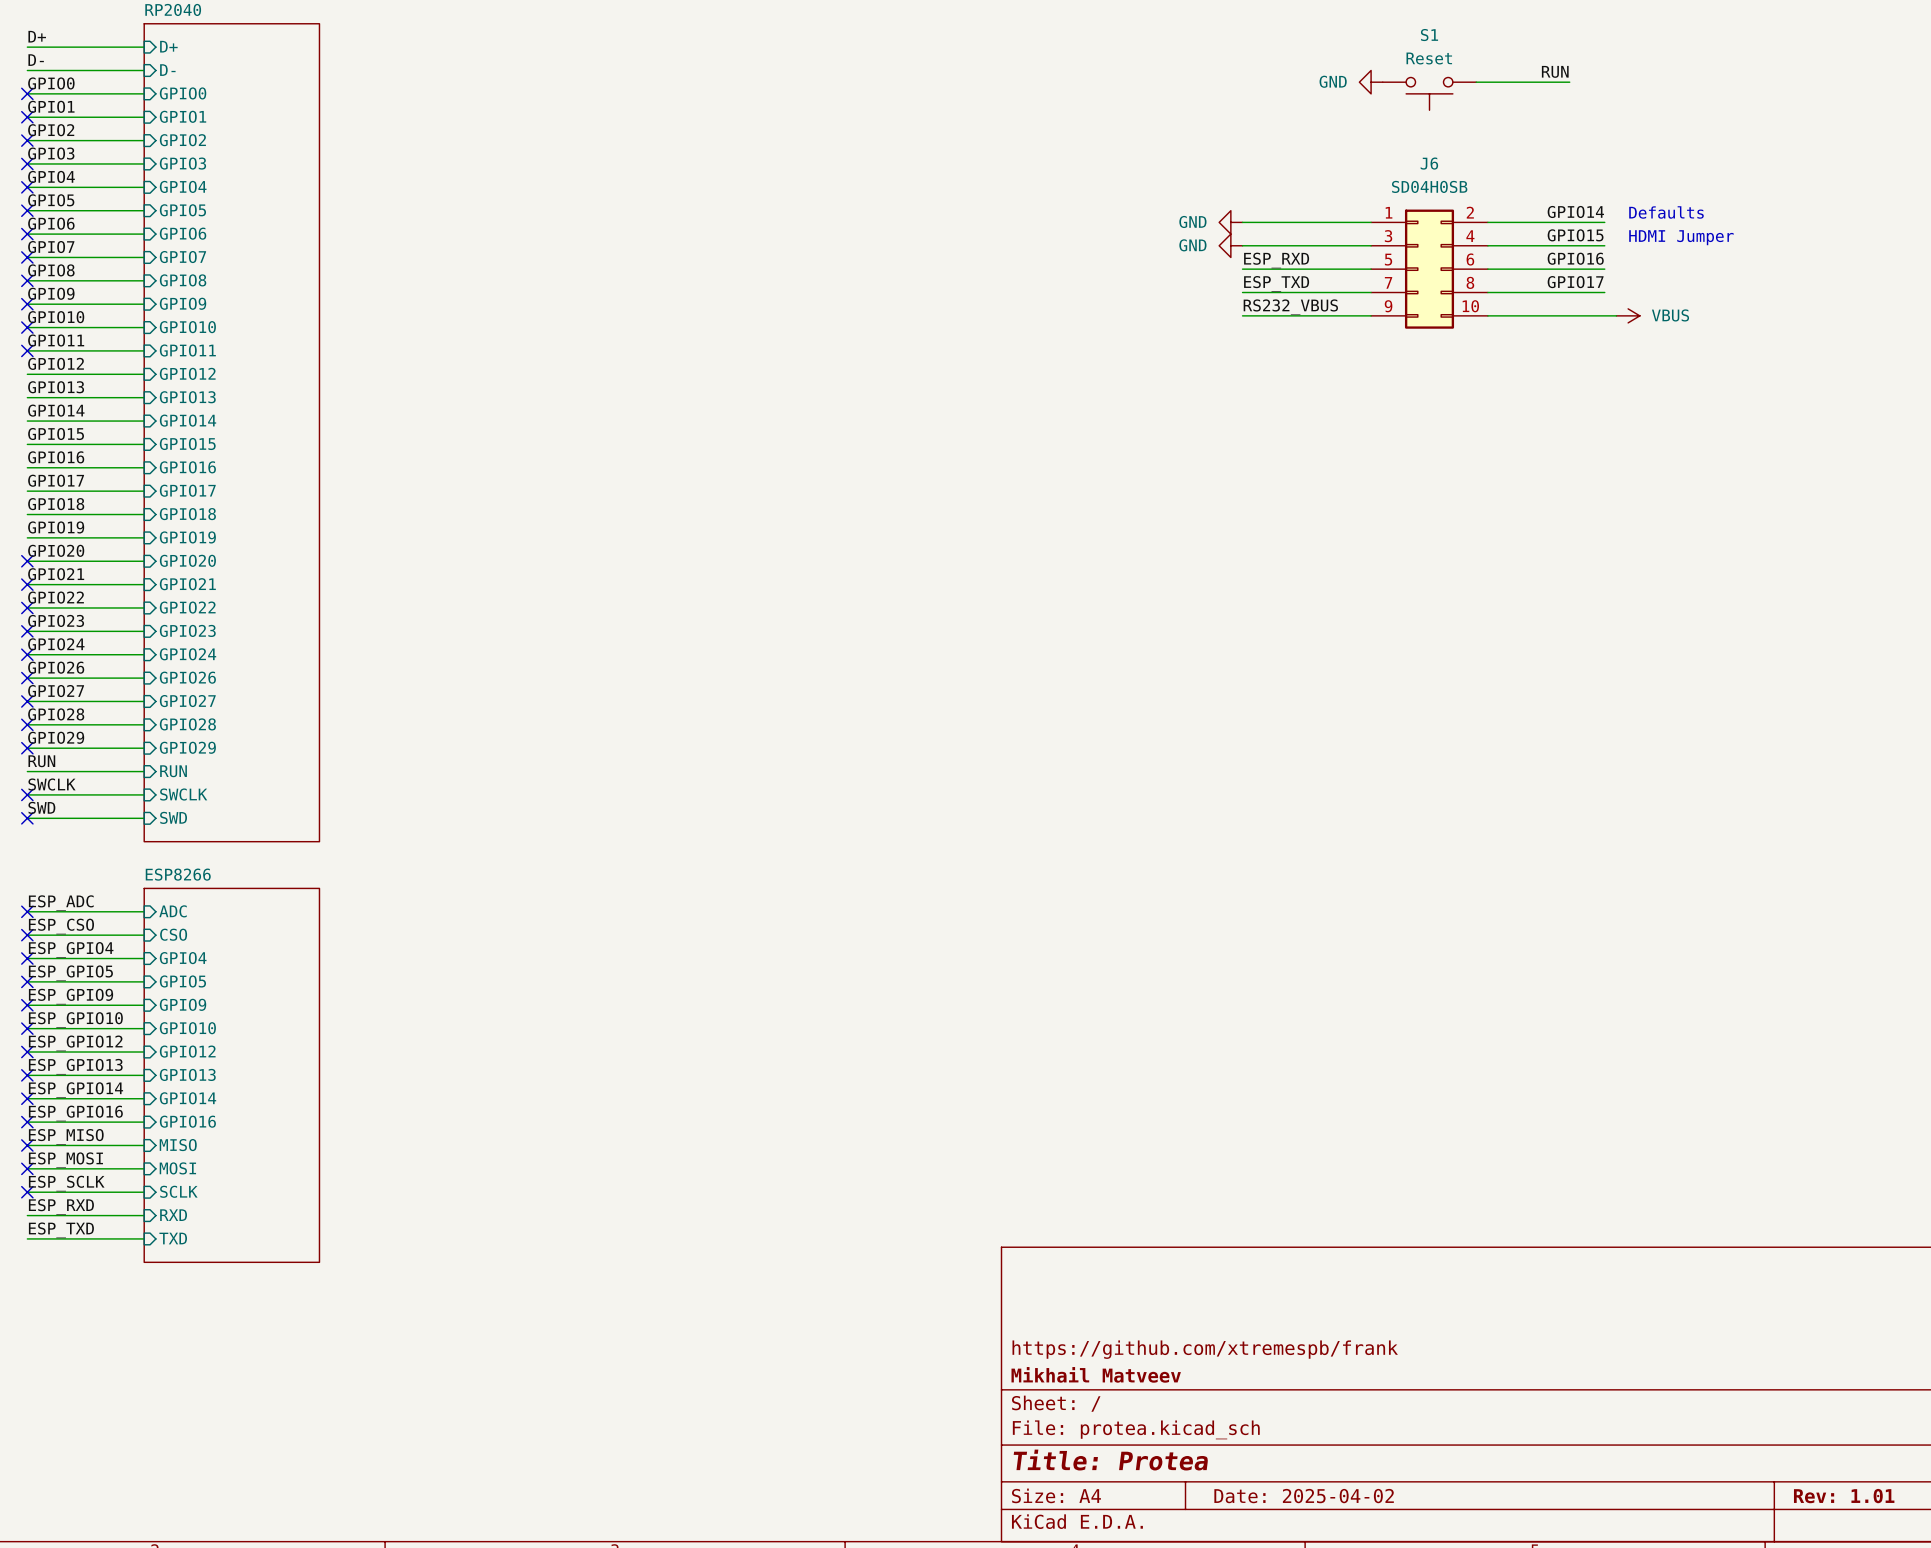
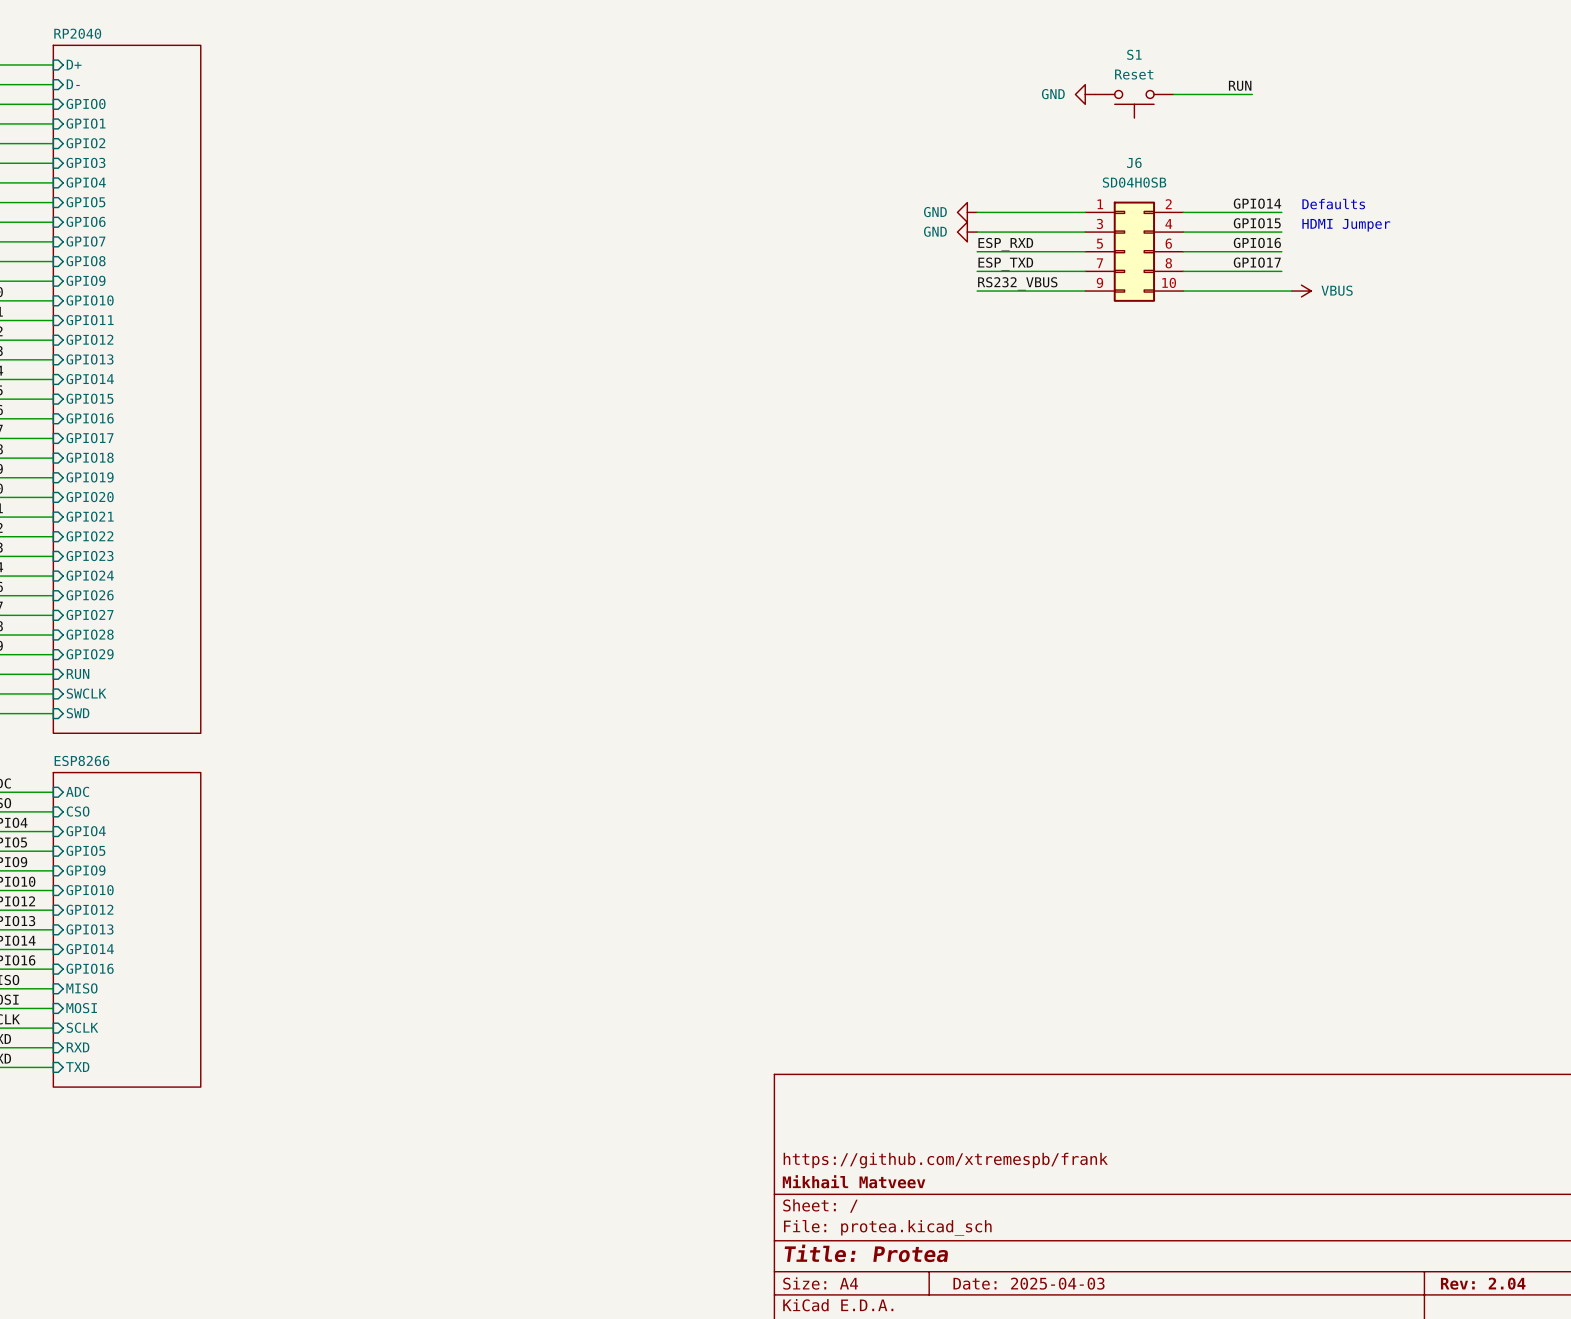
title block: Date: 2025-04-02 (1304, 1496) -> Date: 2025-04-03 (1029, 1283)
title block: Rev: 1.01 (1844, 1496) -> Rev: 2.04 (1483, 1283)

